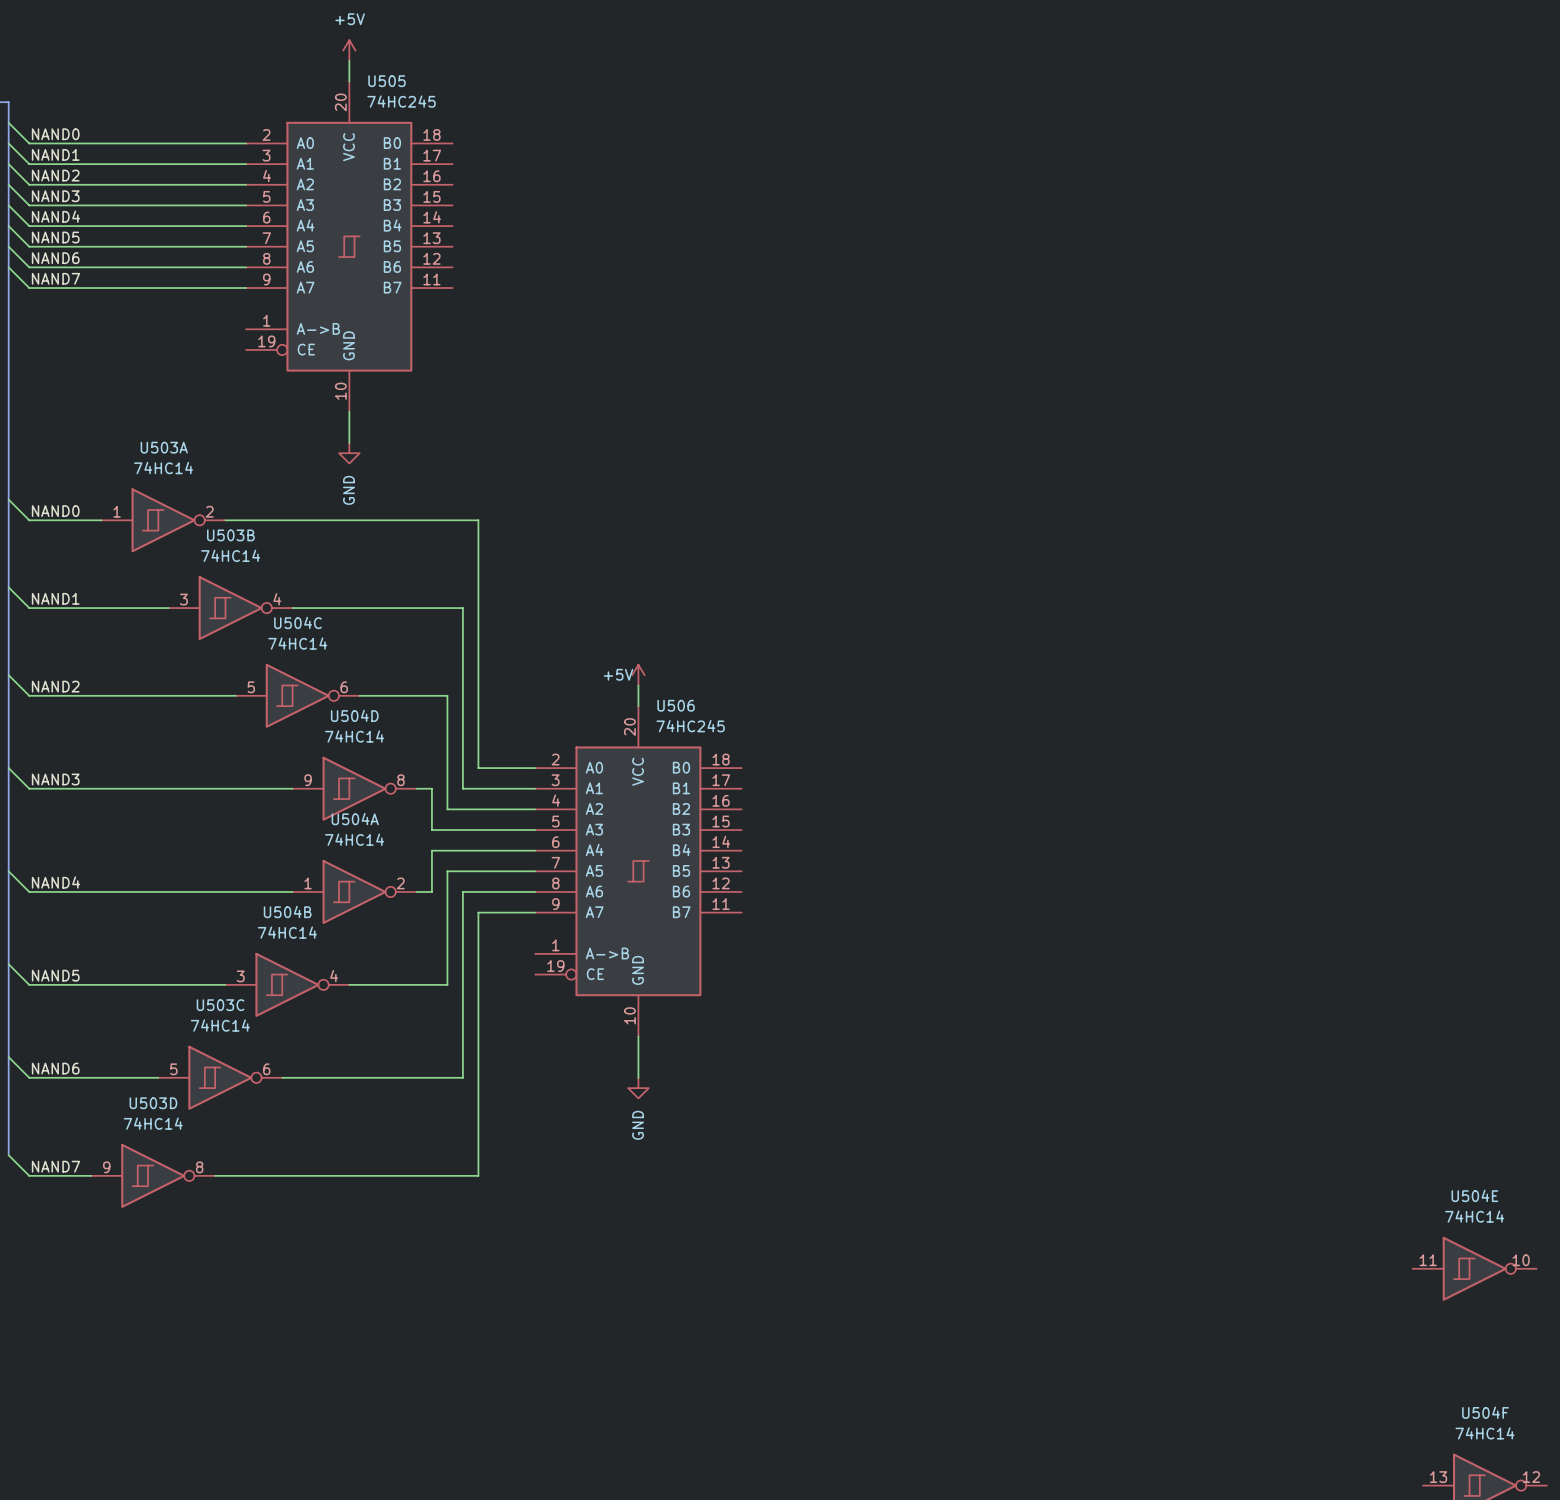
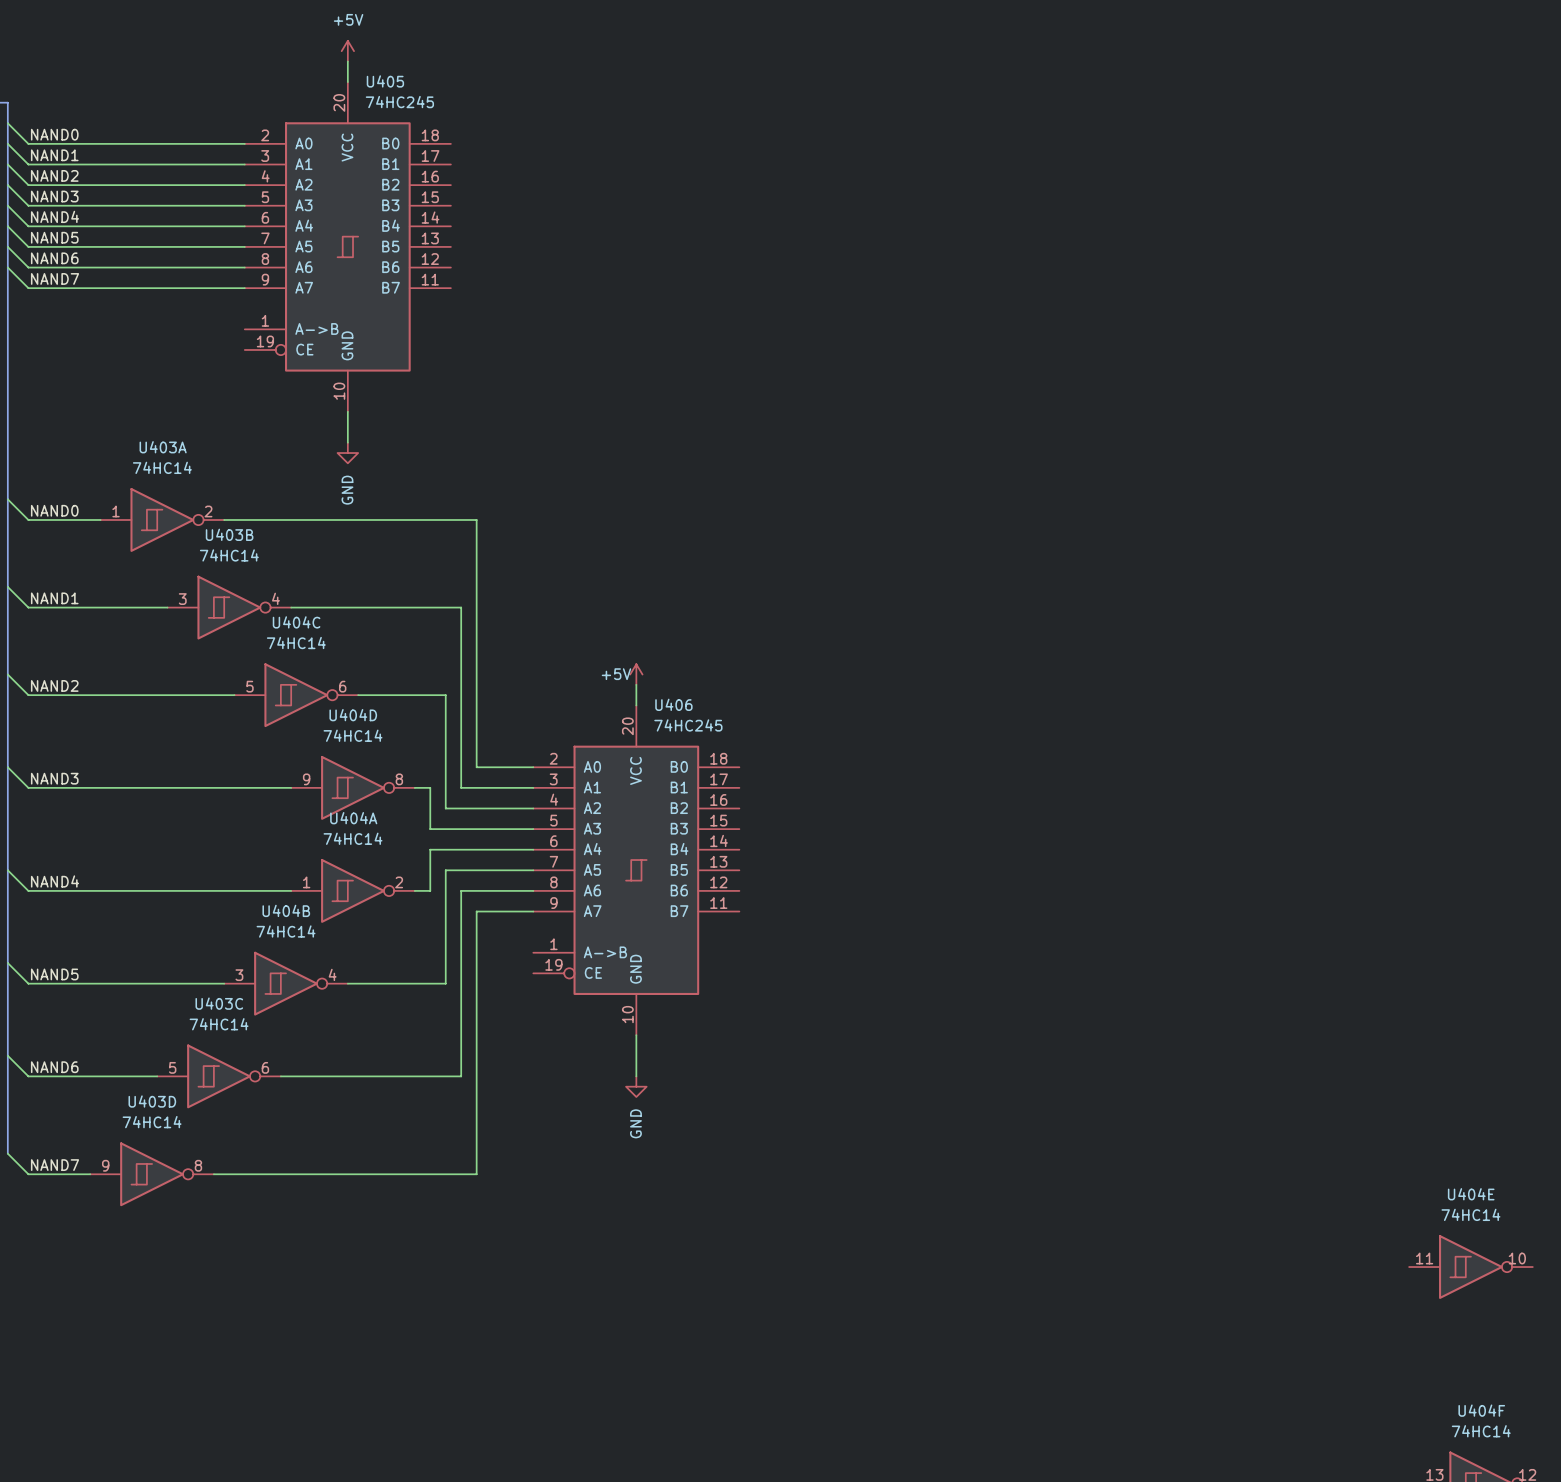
U505 name: U505 (387, 81) -> U405 (385, 81)
U503A name: U503A (164, 447) -> U403A (163, 447)
U503B name: U503B (230, 535) -> U403B (229, 534)
U504C name: U504C (297, 622) -> U404C (296, 622)
U506 name: U506 (676, 705) -> U406 (673, 704)
U504D name: U504D (354, 715) -> U404D (353, 715)
U504A name: U504A (355, 819) -> U404A (353, 818)
U504B name: U504B (287, 911) -> U404B (286, 910)
U503C name: U503C (220, 1005) -> U403C (219, 1003)
U503D name: U503D (153, 1103) -> U403D (152, 1101)
U504E name: U504E (1474, 1195) -> U404E (1471, 1194)
U504F name: U504F (1485, 1412) -> U404F (1481, 1410)

